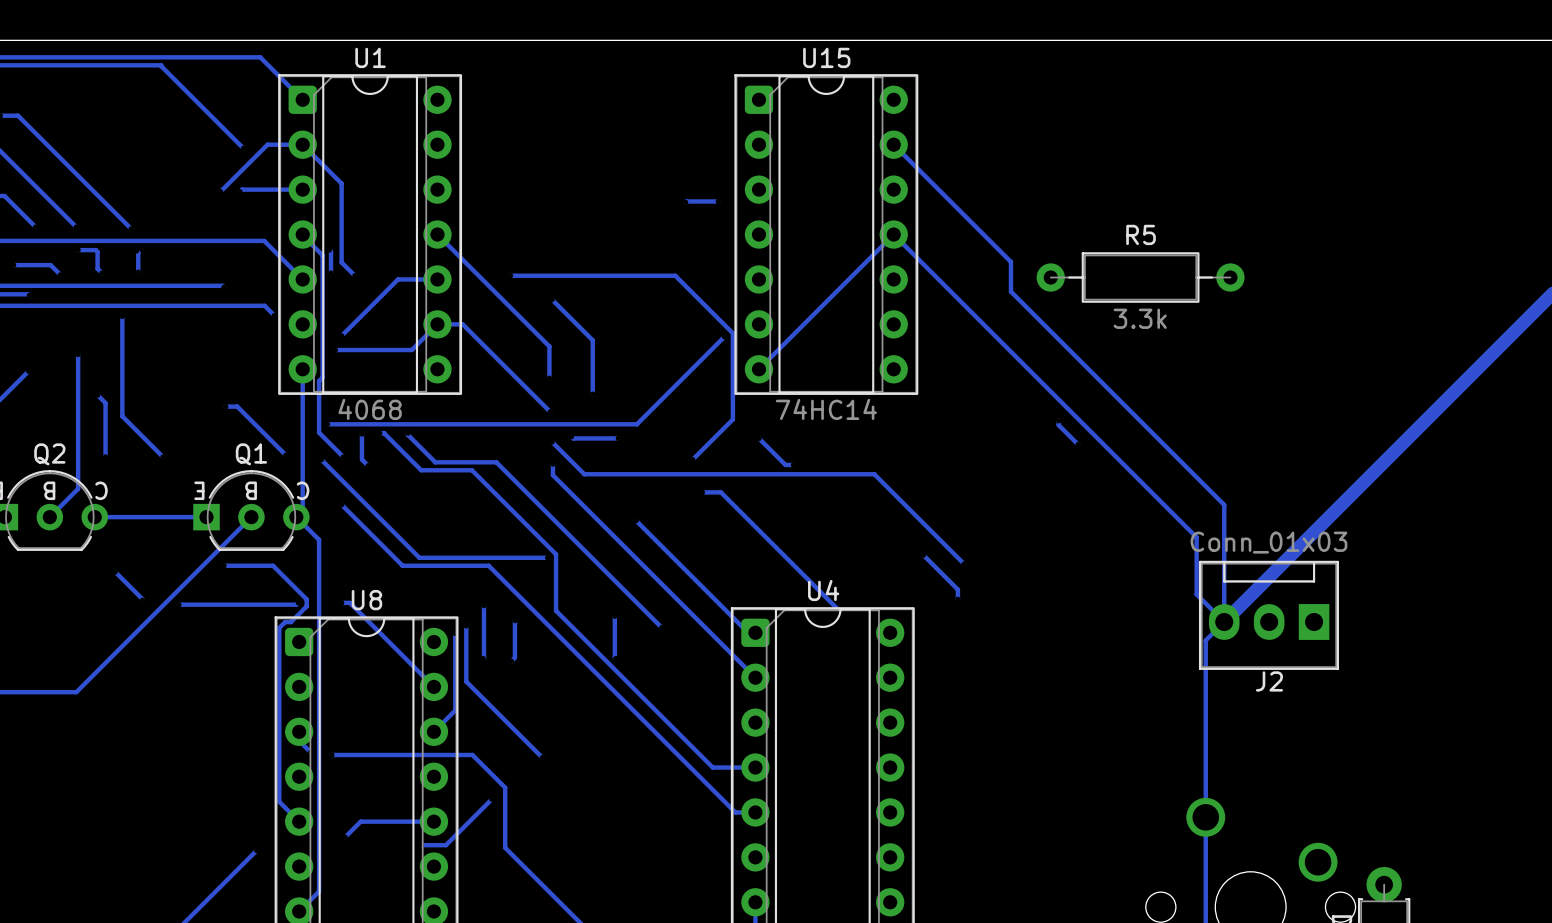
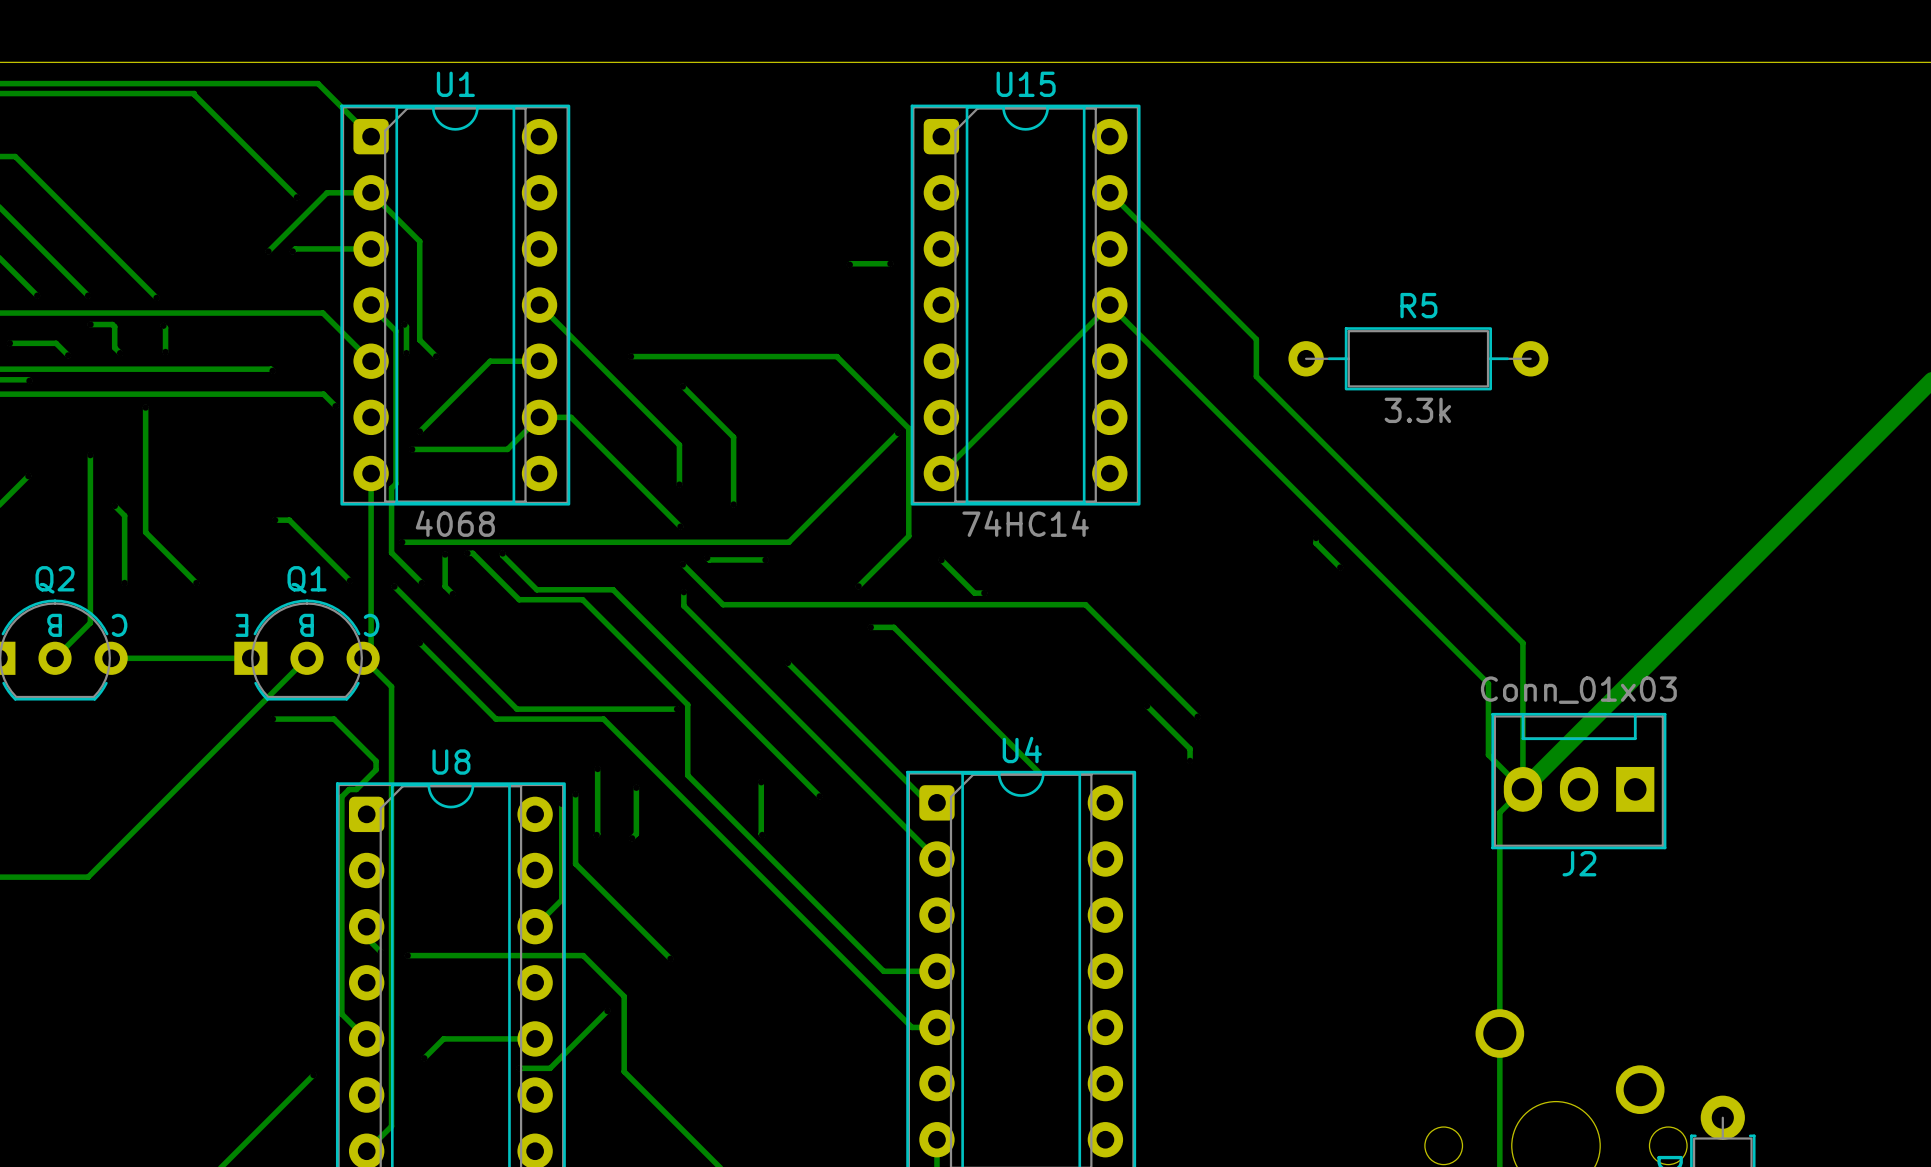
track: (115, 571) (142, 600) -> none
via: (115, 571) -> none
via: (142, 600) -> none
track: (298, 602) (296, 604) (178, 604) -> none
via: (298, 602) -> none
track: (341, 602) (349, 602) (433, 686) -> none
via: (341, 602) -> none
via: (178, 604) -> none

